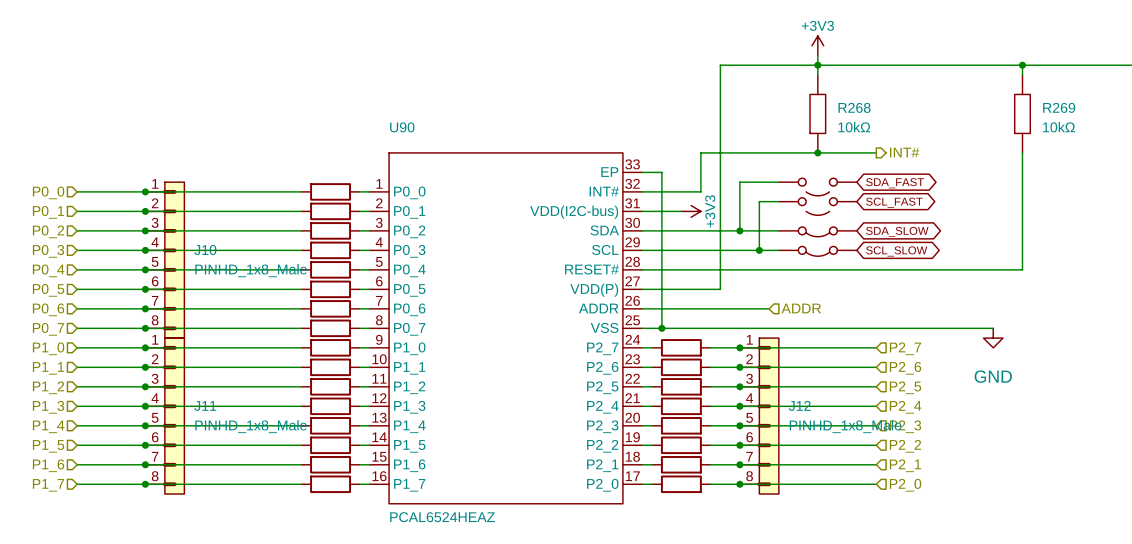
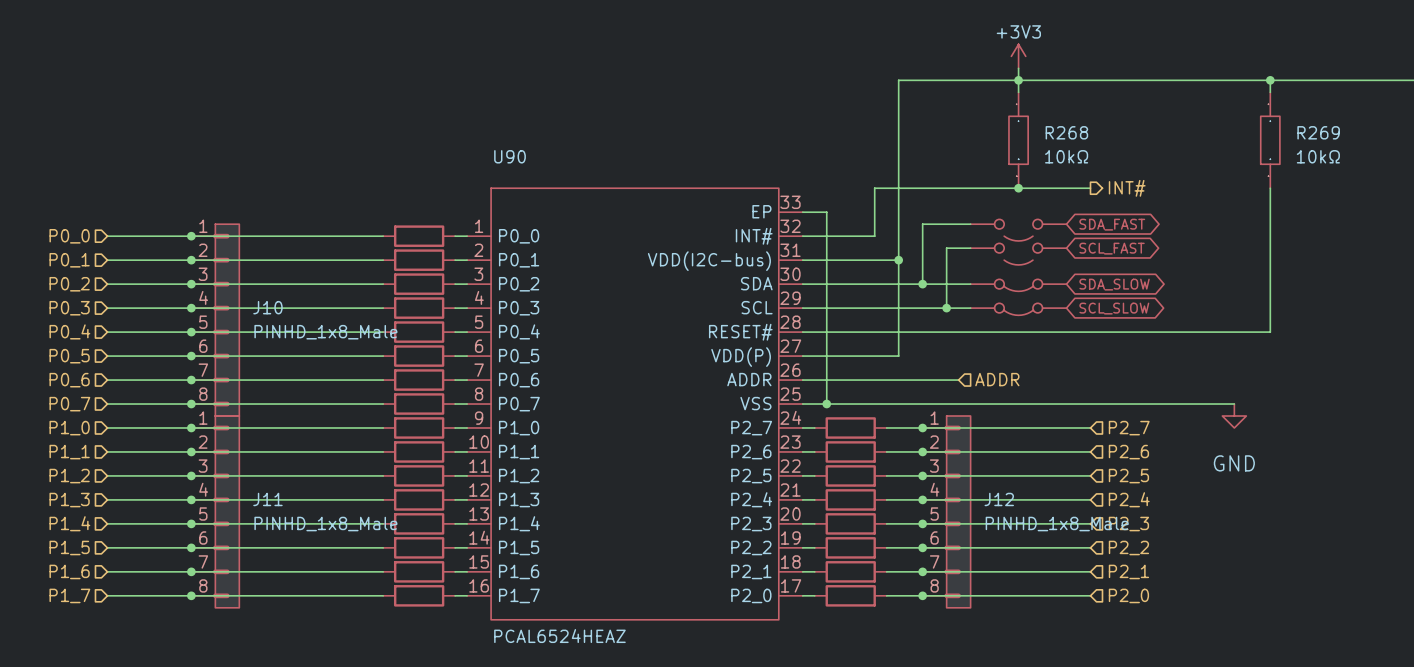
power symbol: +3V3 (691, 211) -> none
junction: none -> (898, 260)

